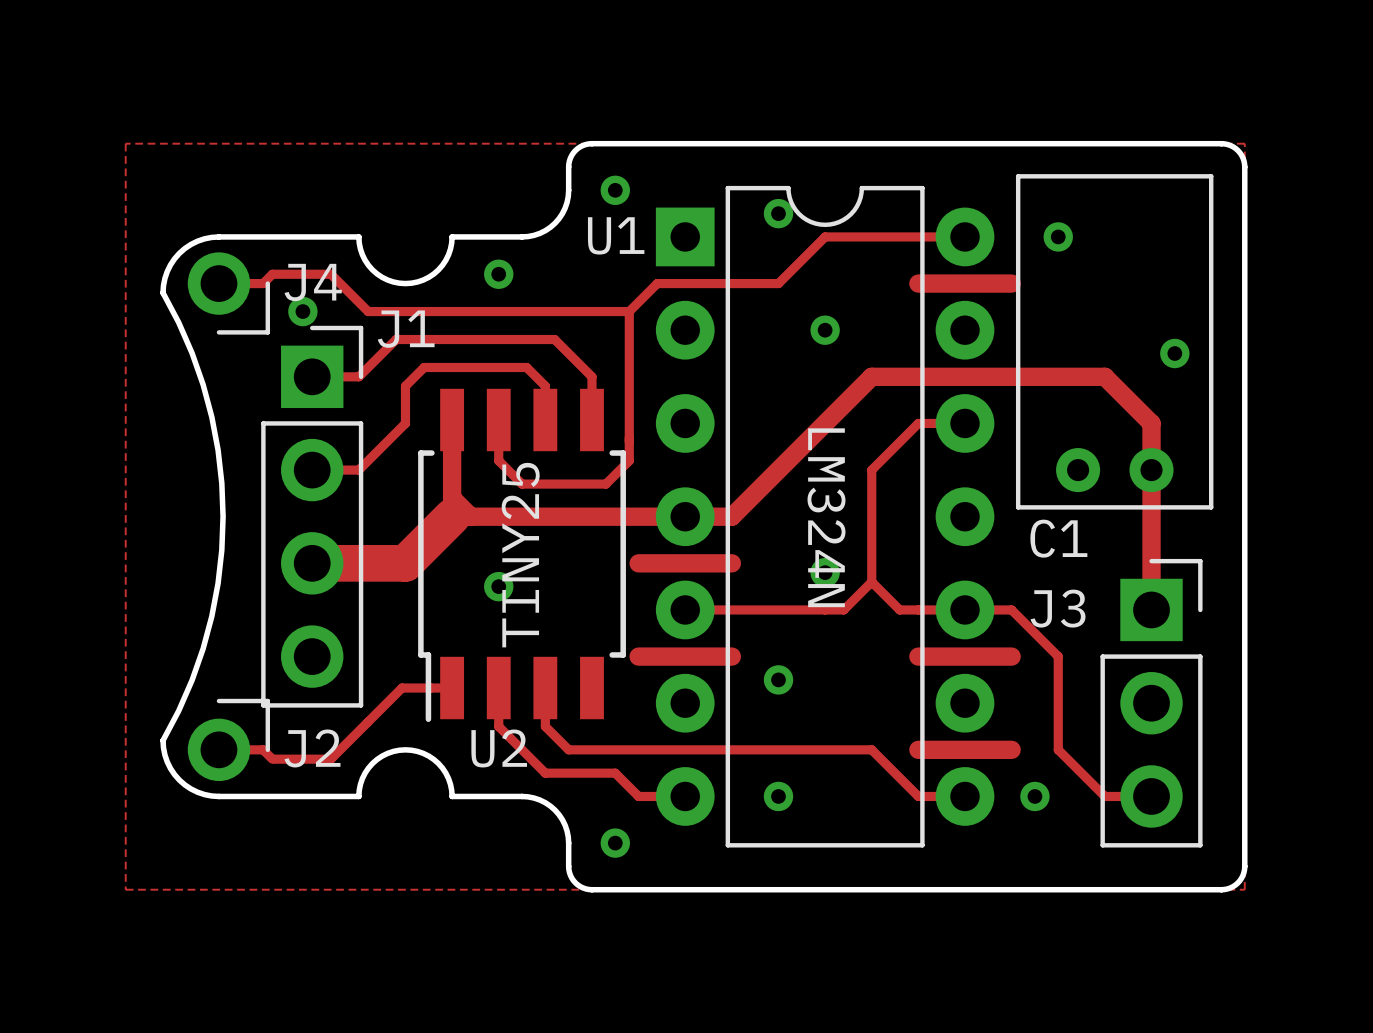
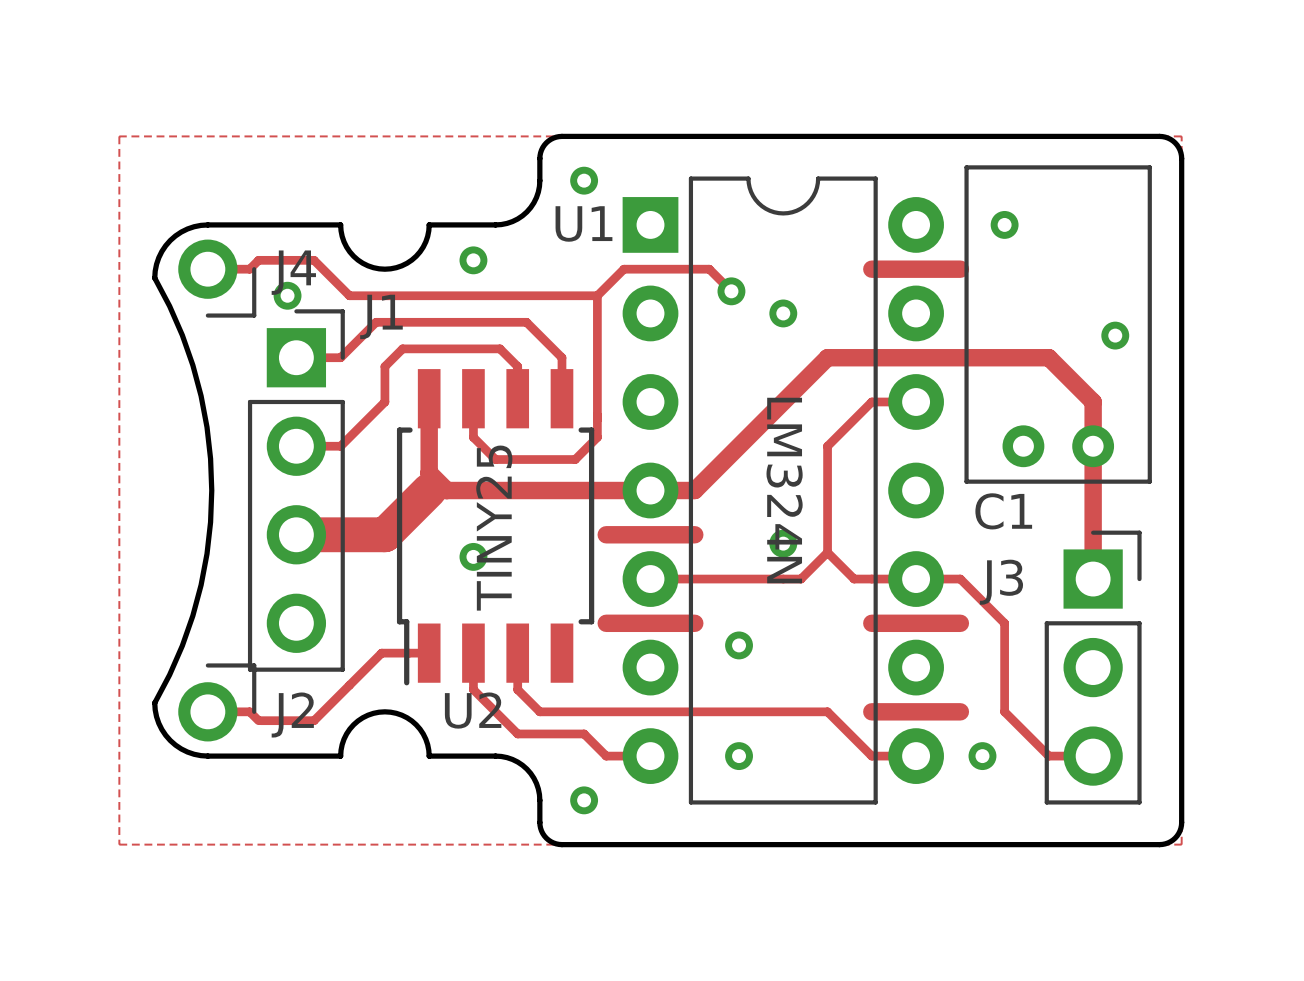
via position: (778, 213) -> (731, 291)
track: (965, 236) (825, 236) (778, 283) (747, 283) -> (731, 291) (709, 269)

